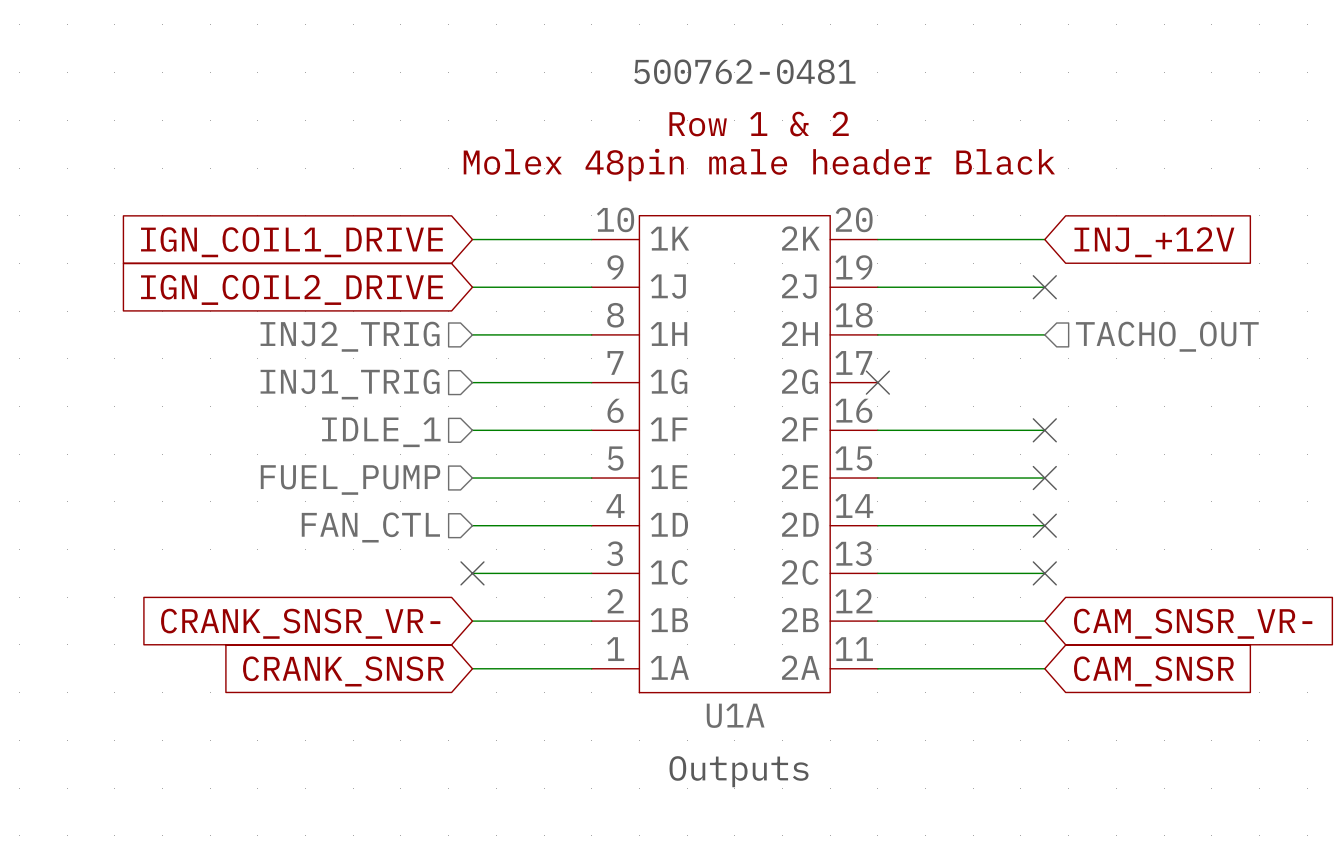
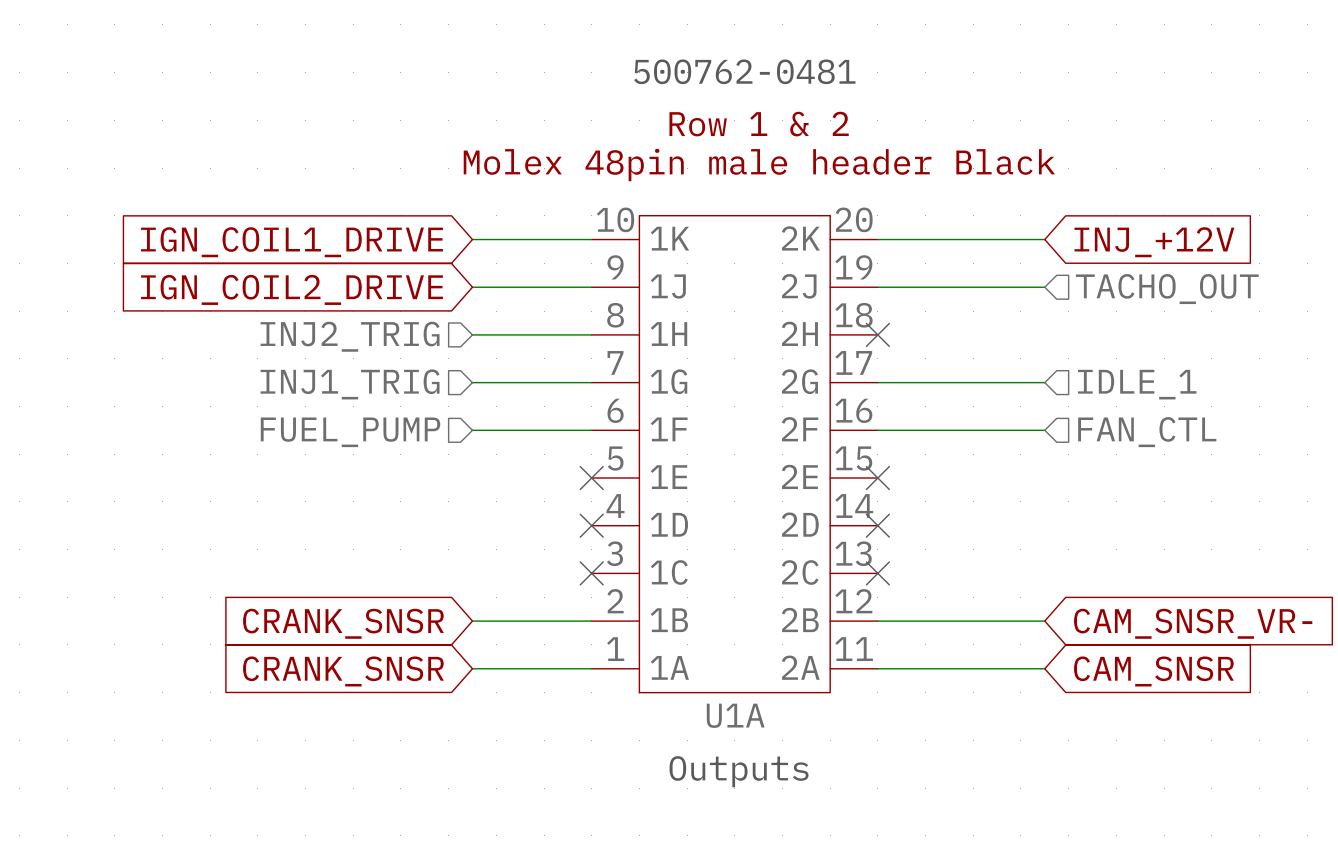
no-connect mark: (1044, 287) -> none
wire: (877, 334) (1044, 334) -> (877, 382) (1044, 382)
no-connect mark: none -> (877, 334)
hierarchical label position: TACHO_OUT (1167, 336) -> TACHO_OUT (1167, 289)
no-connect mark: (877, 382) -> none
hierarchical label: none -> IDLE_1 (1137, 384)
no-connect mark: (1044, 430) -> none
hierarchical label: IDLE_1 (381, 432) -> FUEL_PUMP (350, 432)
hierarchical label: none -> FAN_CTL (1147, 432)
wire: (472, 478) (591, 478) -> none
no-connect mark: none -> (591, 478)
wire: (877, 478) (1044, 478) -> none
no-connect mark: none -> (877, 478)
no-connect mark: (1044, 478) -> none
hierarchical label: FUEL_PUMP (350, 480) -> none
wire: (472, 525) (591, 525) -> none
no-connect mark: none -> (591, 525)
wire: (877, 525) (1044, 525) -> none
no-connect mark: none -> (877, 525)
no-connect mark: (1044, 525) -> none
hierarchical label: FAN_CTL (370, 527) -> none
wire: (472, 573) (591, 573) -> none
no-connect mark: (472, 573) -> none
no-connect mark: none -> (591, 573)
wire: (877, 573) (1044, 573) -> none
no-connect mark: none -> (877, 573)
no-connect mark: (1044, 573) -> none
global label: CRANK_SNSR_VR- (300, 623) -> CRANK_SNSR (343, 623)

